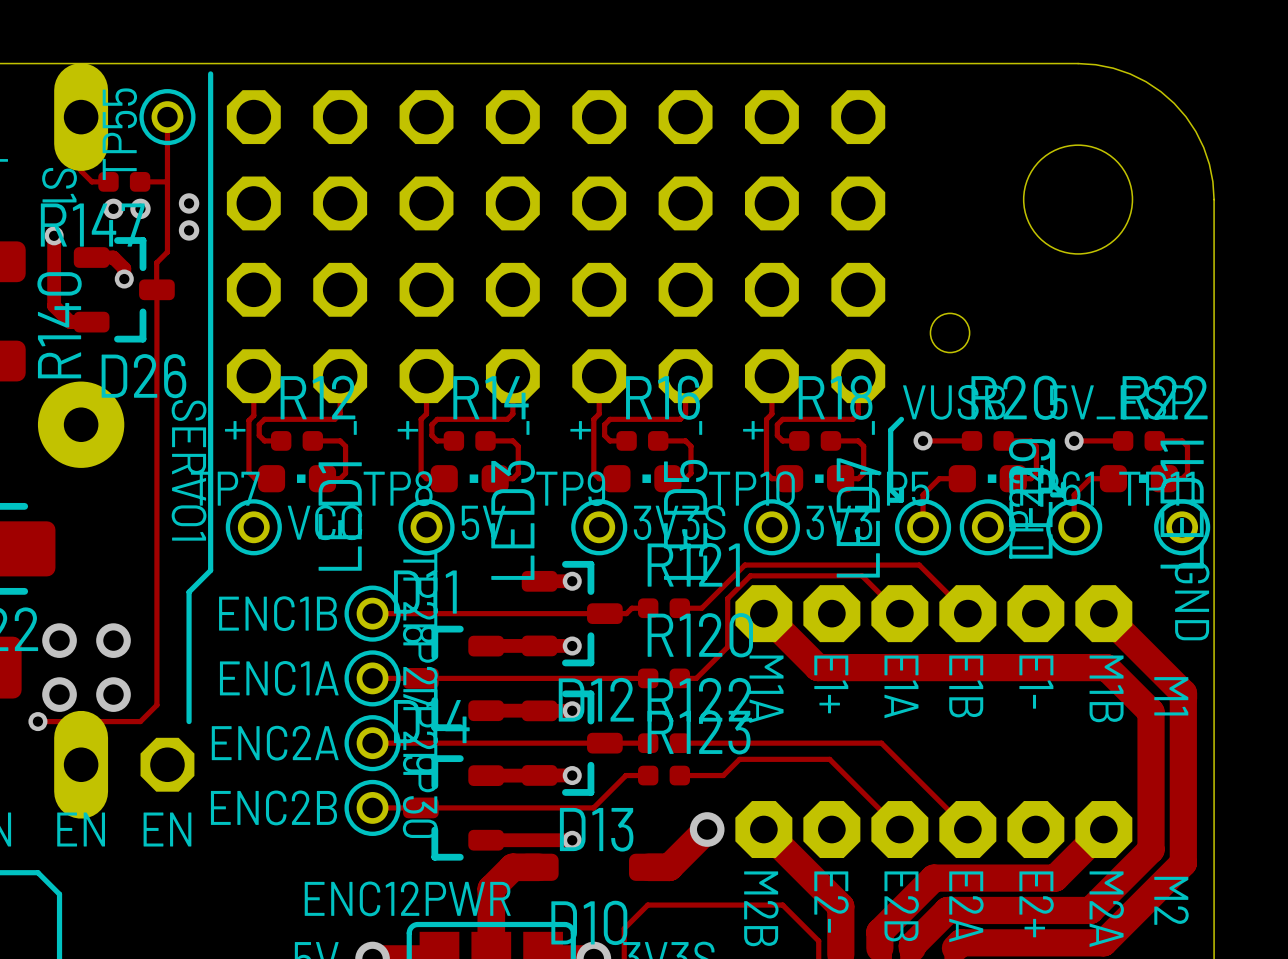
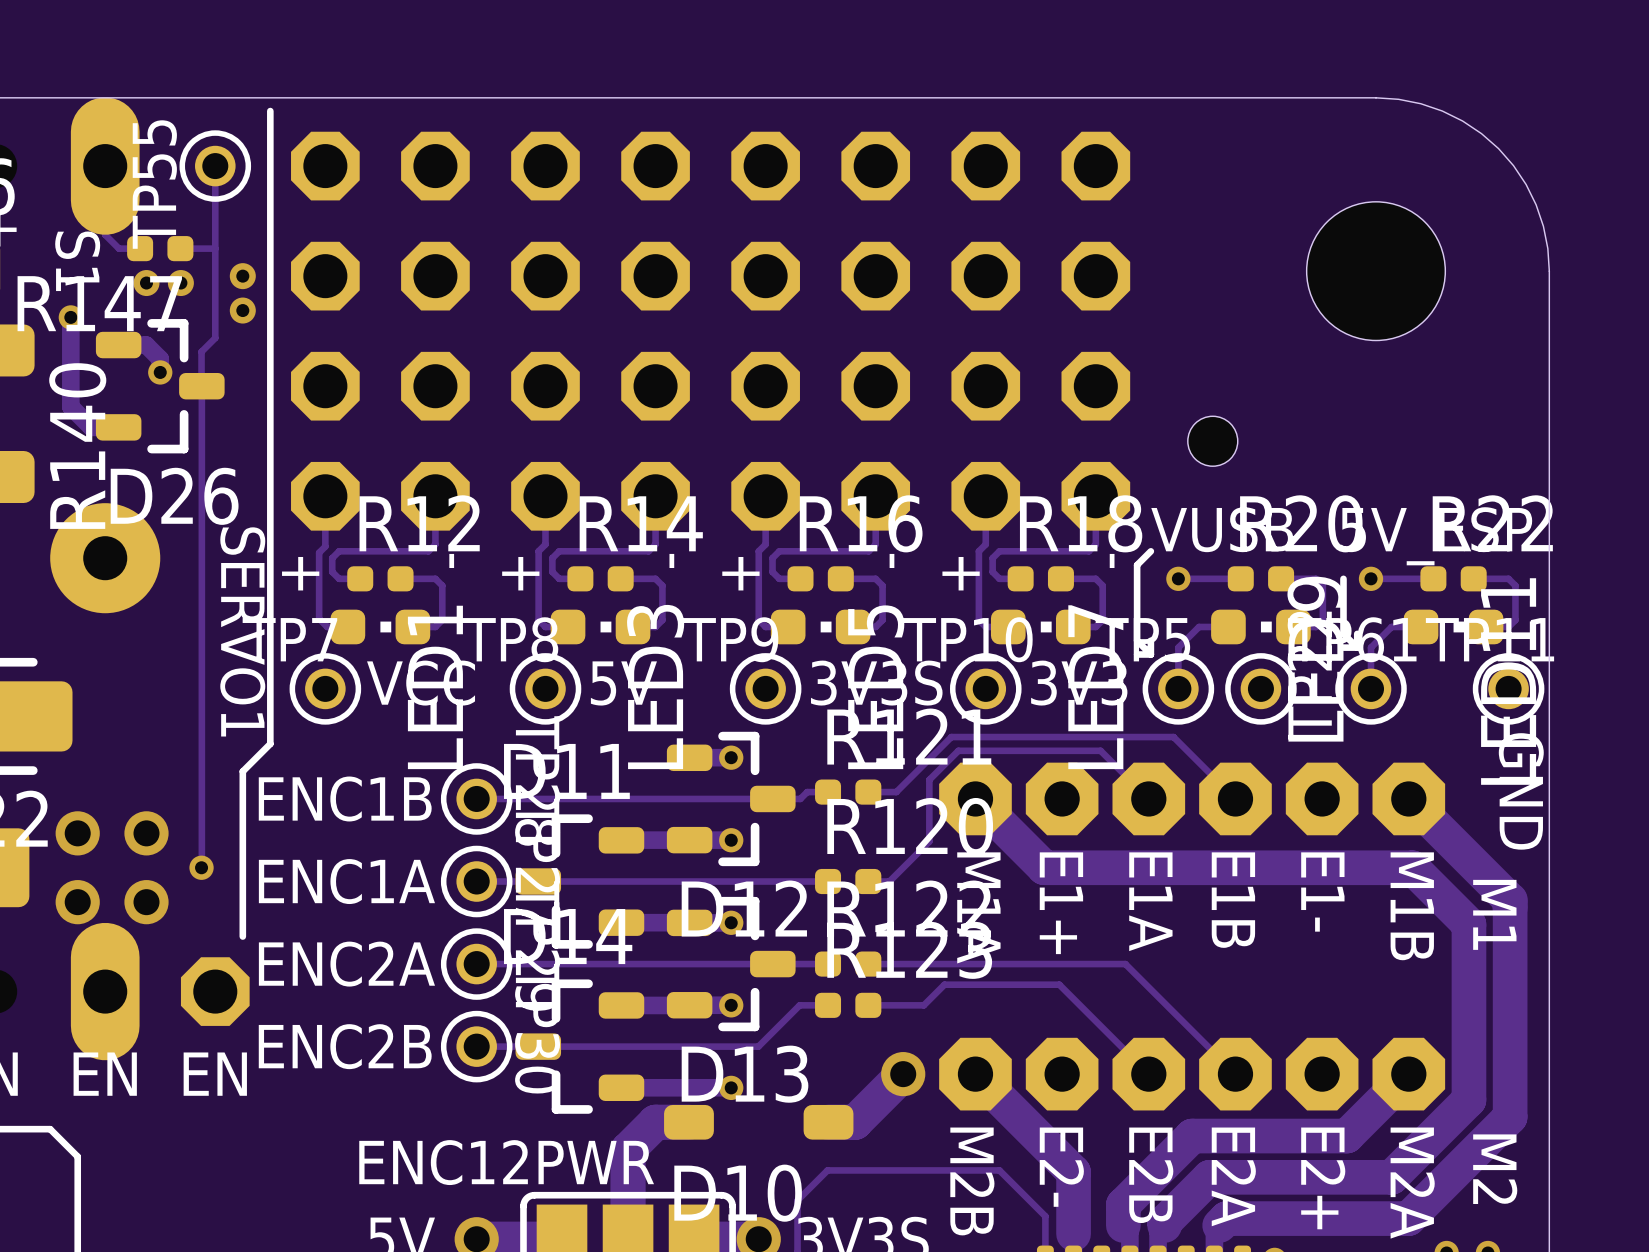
track: (156, 667) (156, 705) (140, 721) (37, 721) -> none
via position: (37, 721) -> (201, 867)

